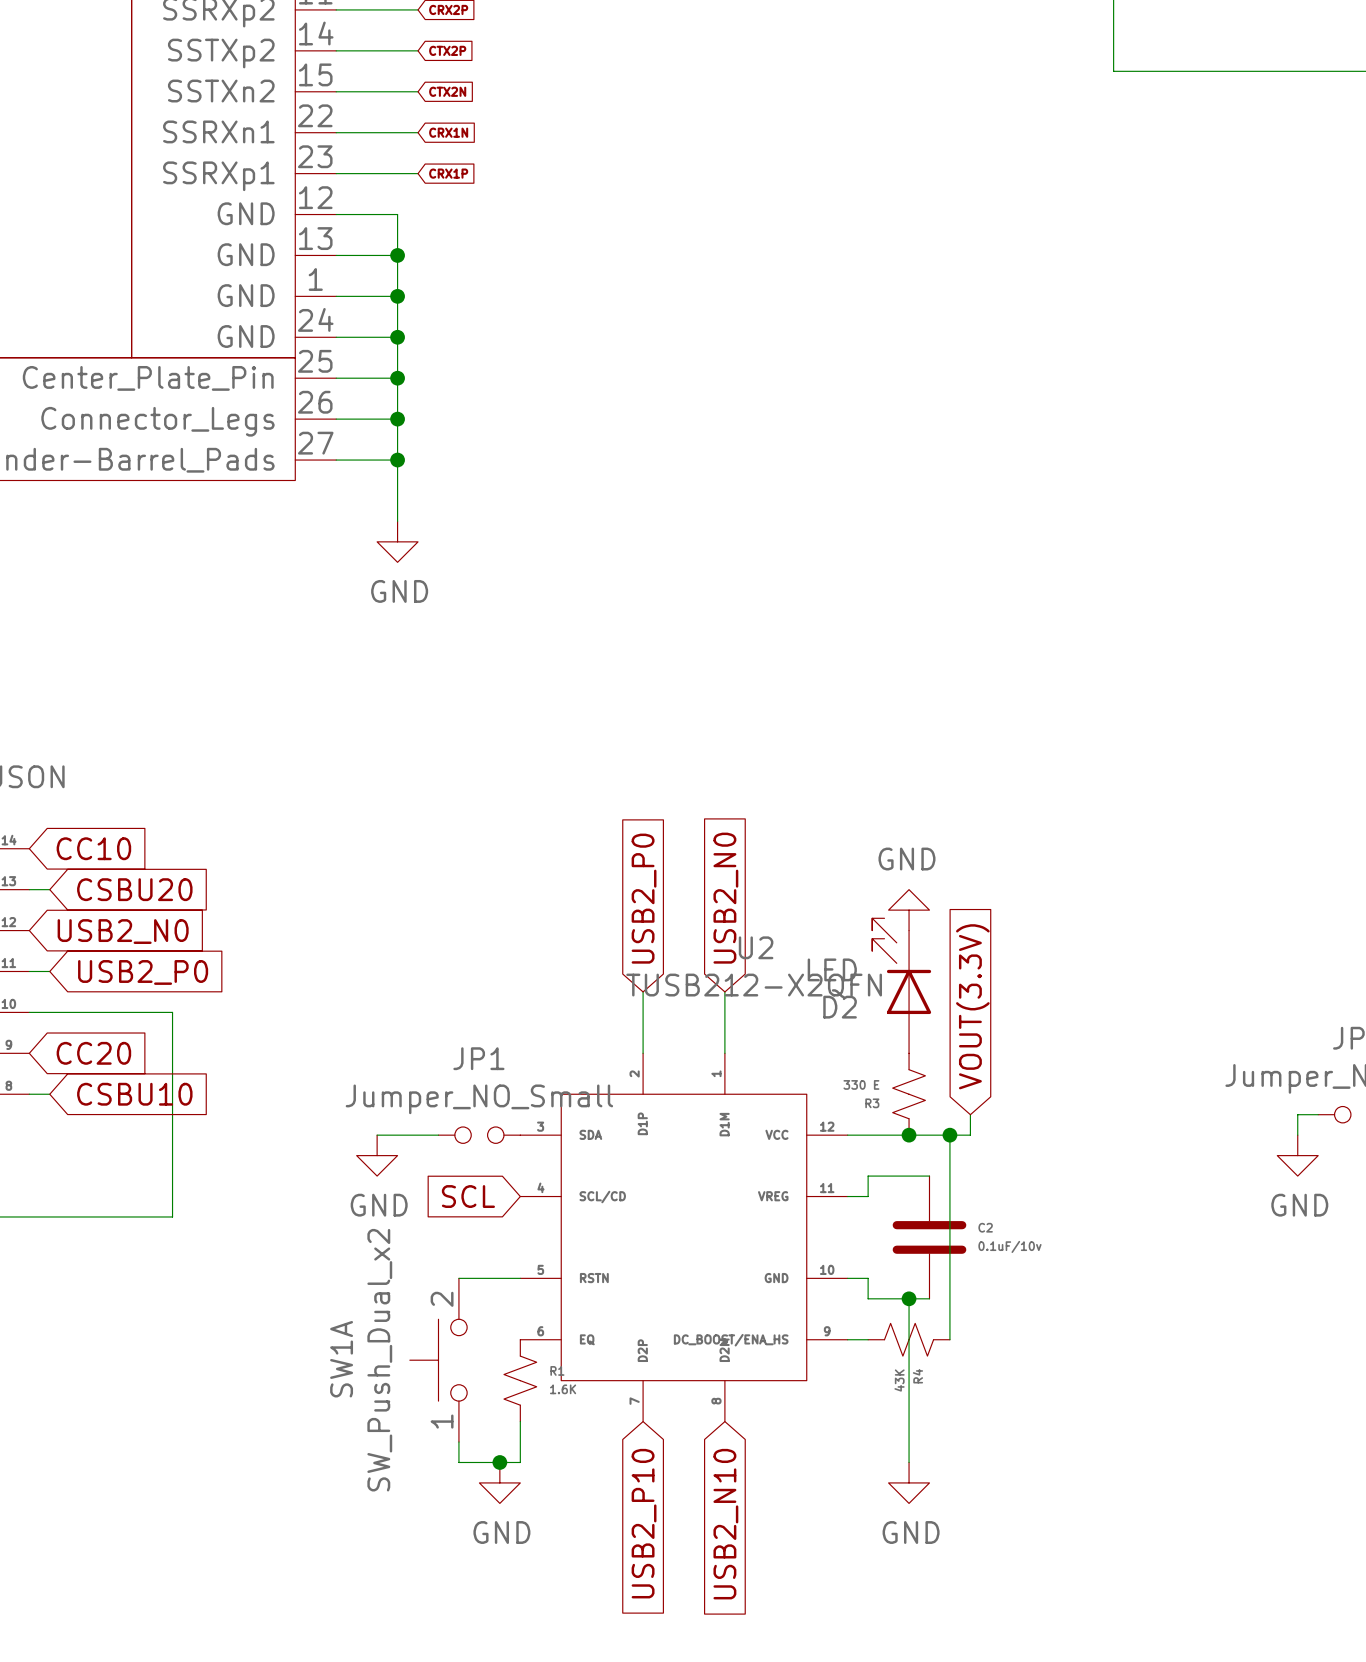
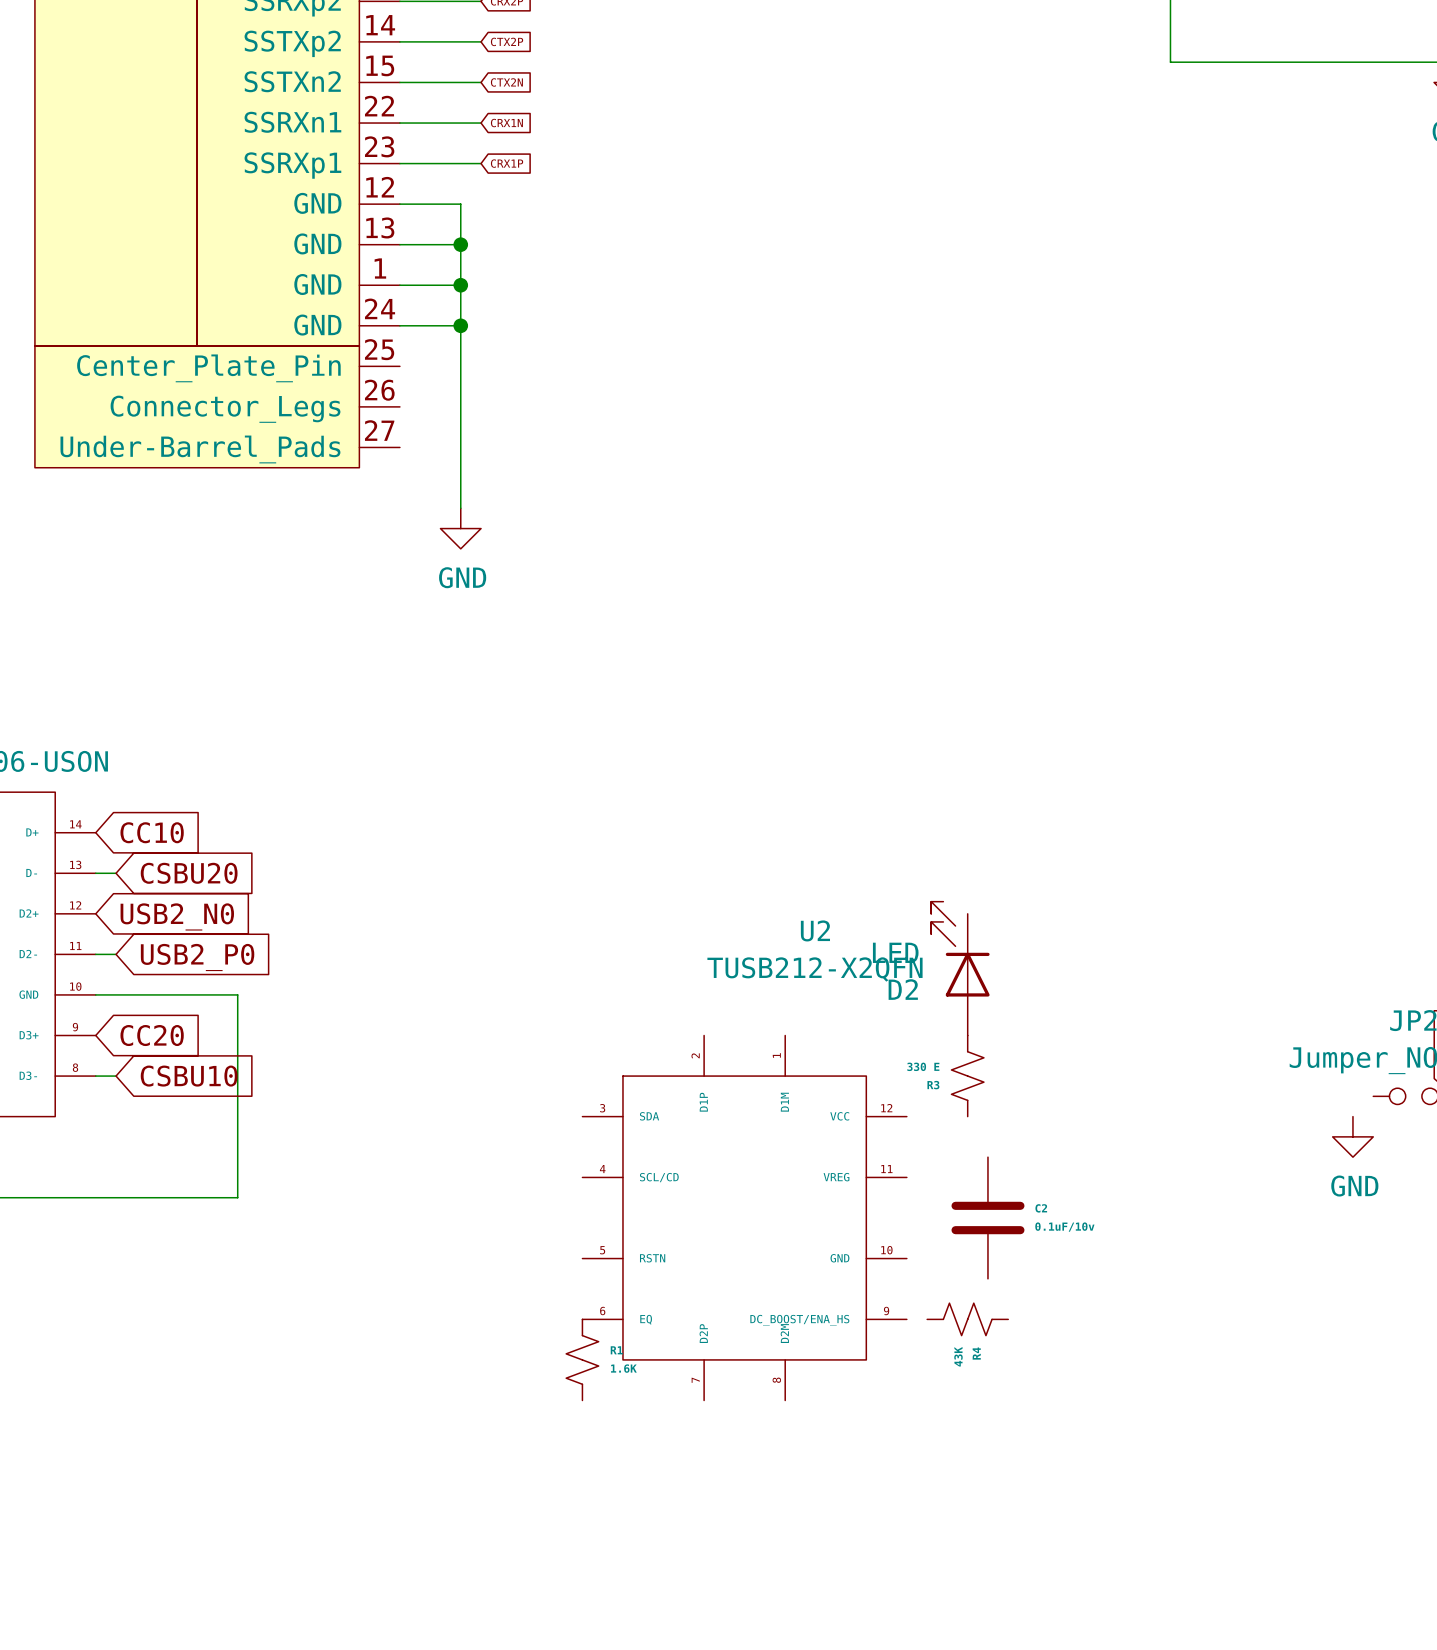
wire: (336, 378) (397, 378) -> none
junction: (397, 378) -> none
wire: (336, 419) (397, 419) -> none
junction: (397, 419) -> none
wire: (336, 460) (397, 460) -> none
junction: (397, 460) -> none
global label: USB2_P0 (644, 898) -> none
global label: USB2_N0 (725, 898) -> none
power symbol: GND (909, 910) -> none
wire: (643, 991) (643, 1053) -> none
wire: (724, 991) (724, 1053) -> none
global label: VOUT(3.3V) (972, 1006) -> none
wire: (970, 1114) (970, 1135) (847, 1135) -> none
wire: (1318, 1114) (1297, 1114) (1297, 1135) -> none
wire: (377, 1135) (438, 1135) -> none
JP1: Jumper_NO_Small (479, 1135) -> none
junction: (909, 1135) -> none
wire: (949, 1135) (949, 1339) -> none
junction: (949, 1135) -> none
power symbol: GND (377, 1155) -> none
wire: (929, 1176) (868, 1176) (868, 1196) (847, 1196) -> none
global label: SCL (468, 1196) -> none
wire: (458, 1278) (520, 1278) -> none
wire: (847, 1278) (868, 1278) (868, 1298) (929, 1298) -> none
wire: (909, 1298) (909, 1462) -> none
junction: (909, 1298) -> none
wire: (847, 1339) (868, 1339) -> none
SW1A: SW_Push_Dual_x2 (438, 1360) -> none
wire: (520, 1421) (520, 1462) (458, 1462) (458, 1442) -> none
junction: (499, 1462) -> none
power symbol: GND (499, 1482) -> none
power symbol: GND (909, 1482) -> none
global label: USB2_P10 (644, 1523) -> none
global label: USB2_N10 (725, 1524) -> none

